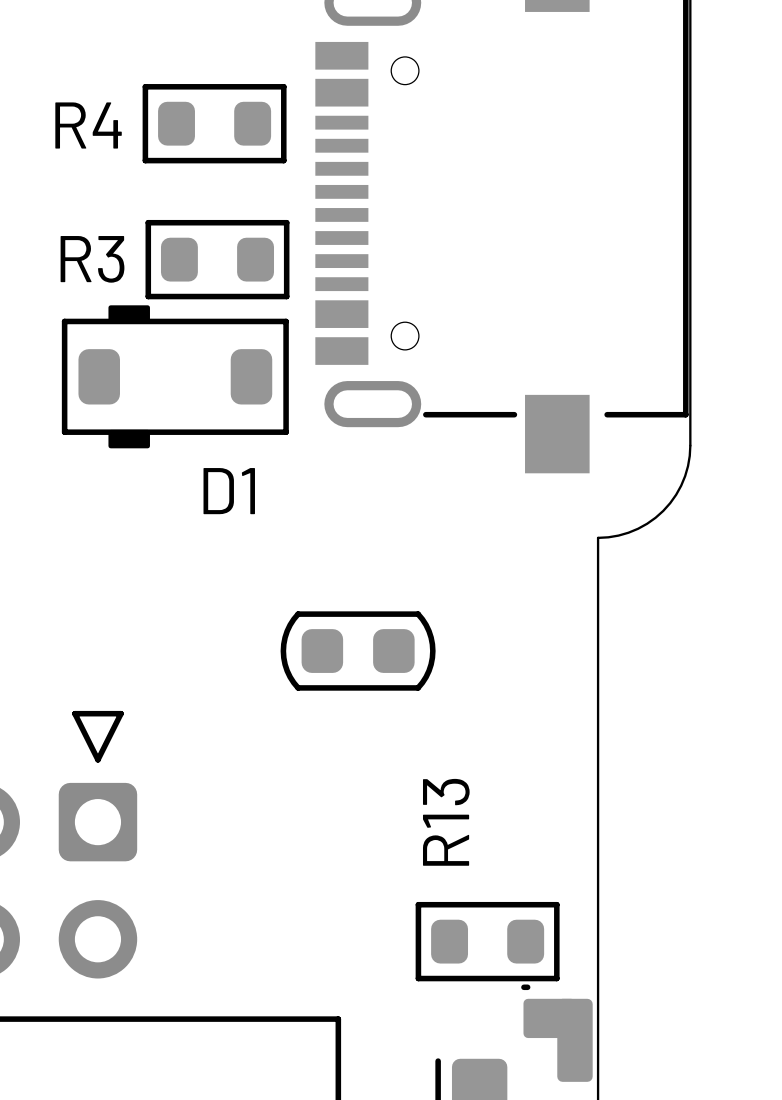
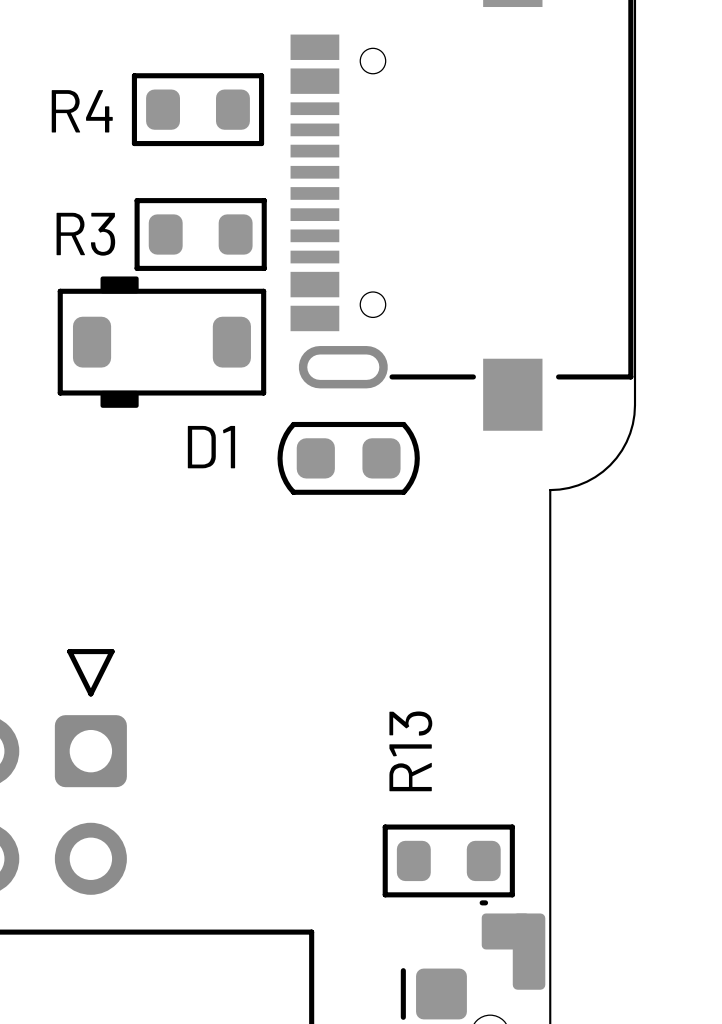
part position: (358, 651) -> (348, 458)

